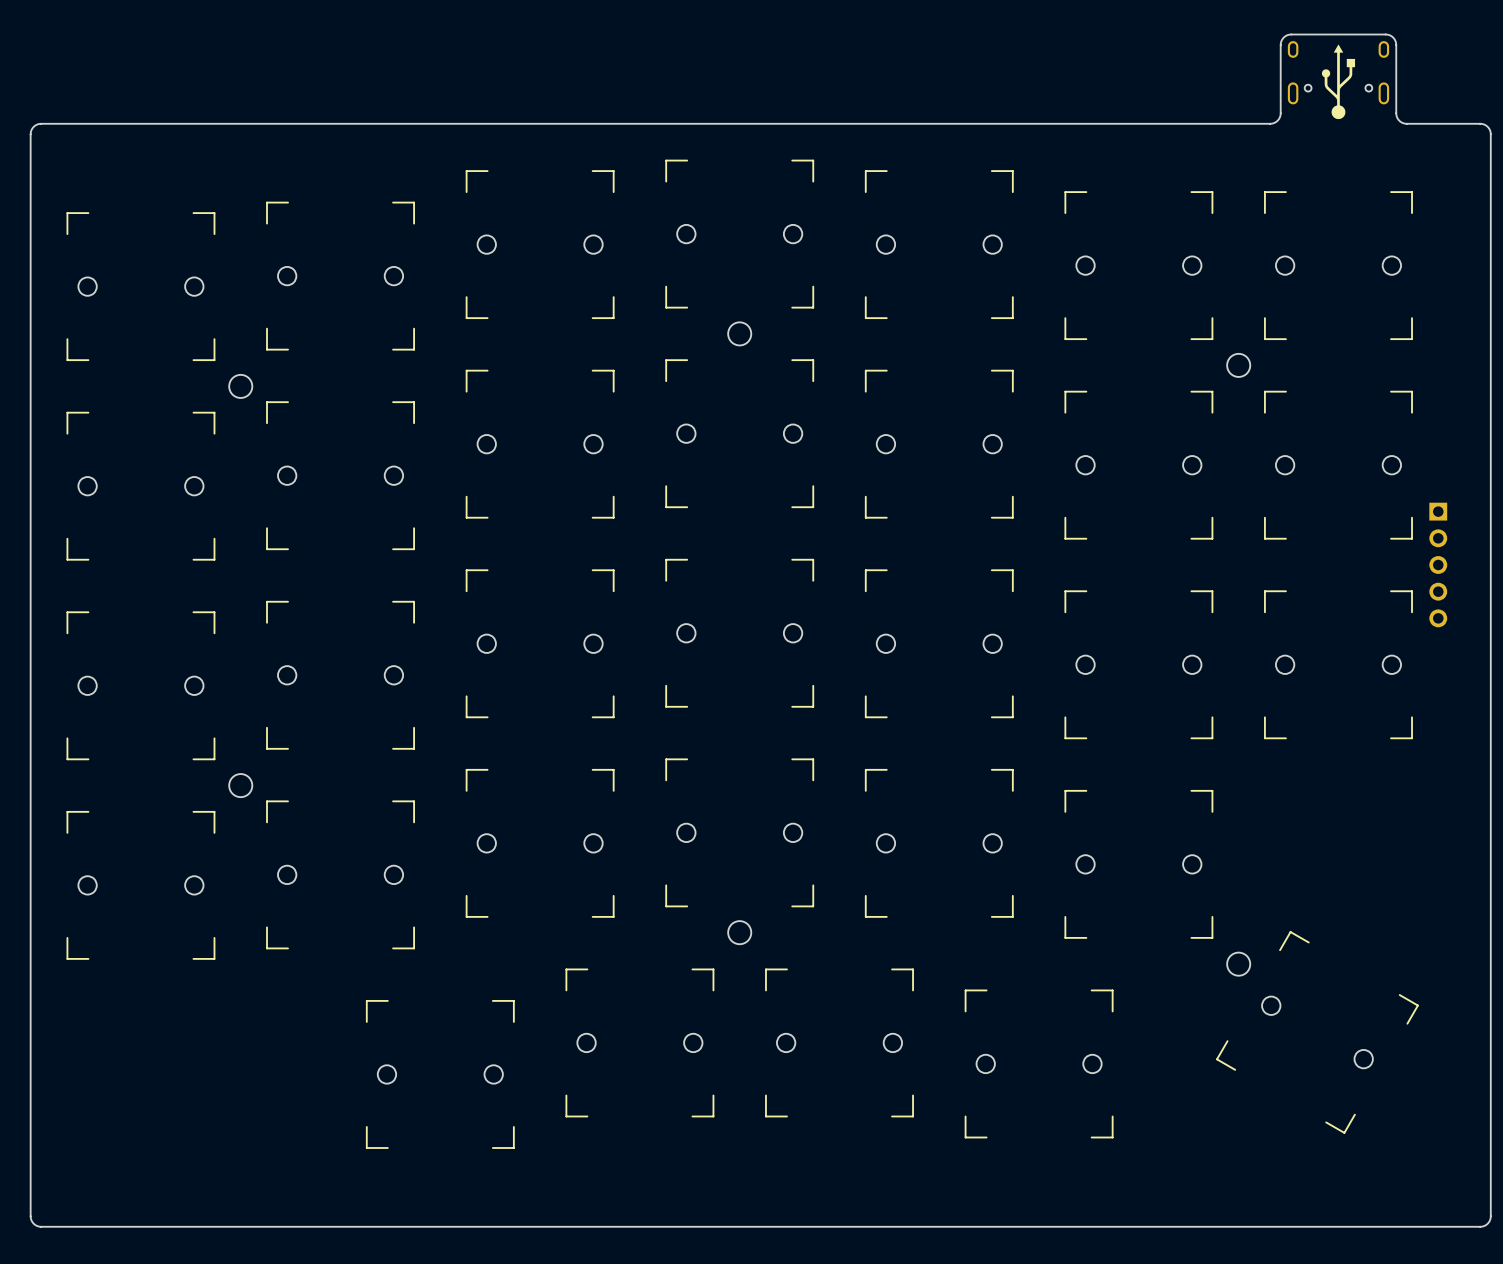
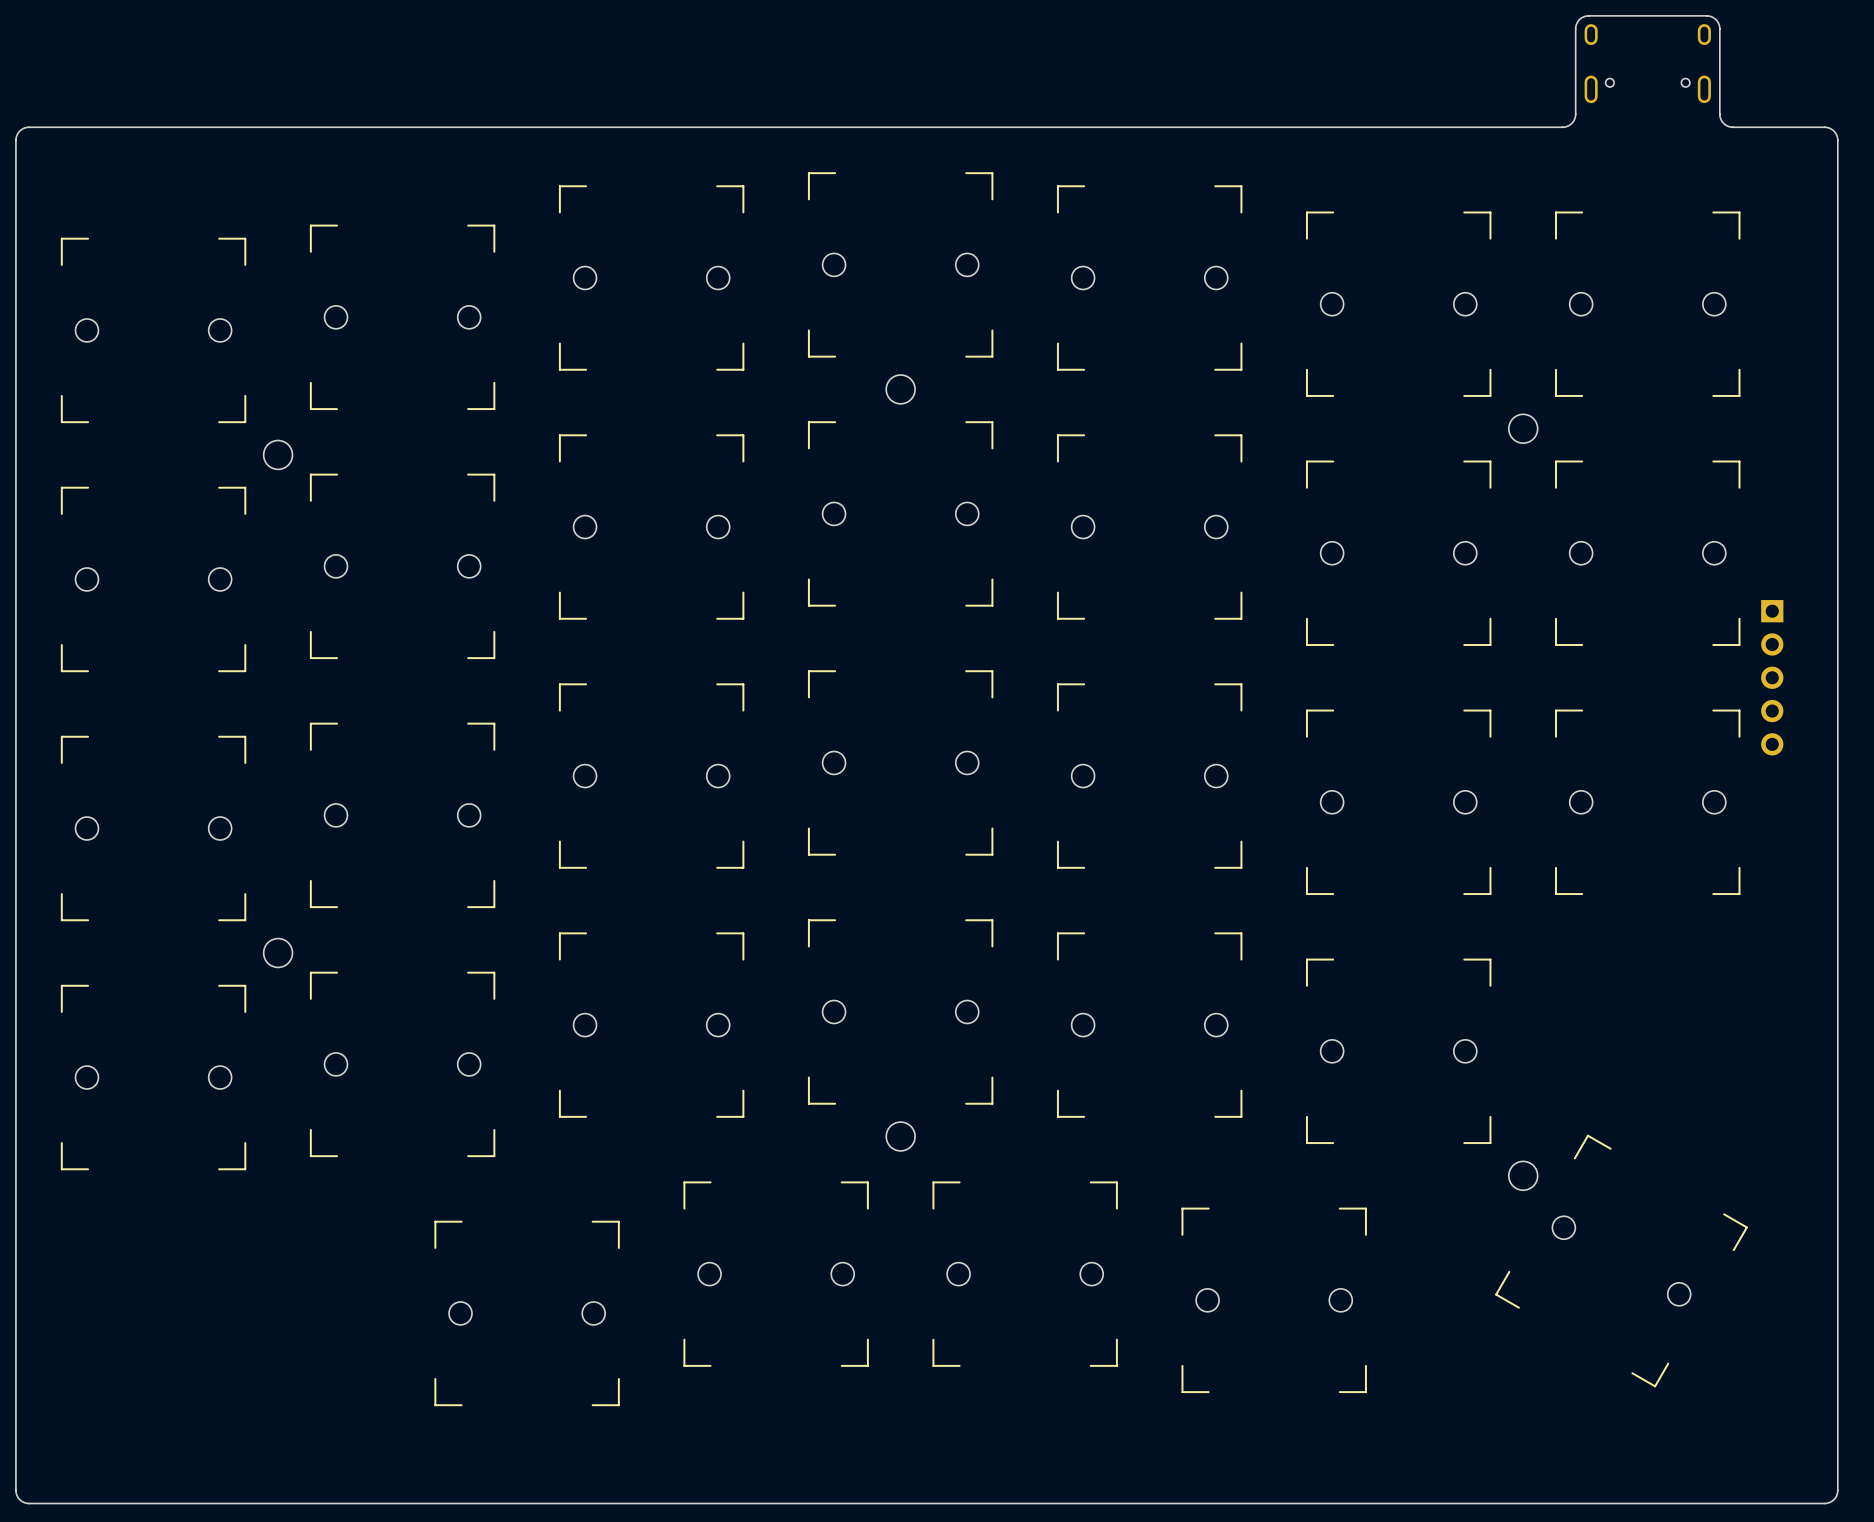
drawing: [1321, 44, 1356, 120] -> none

